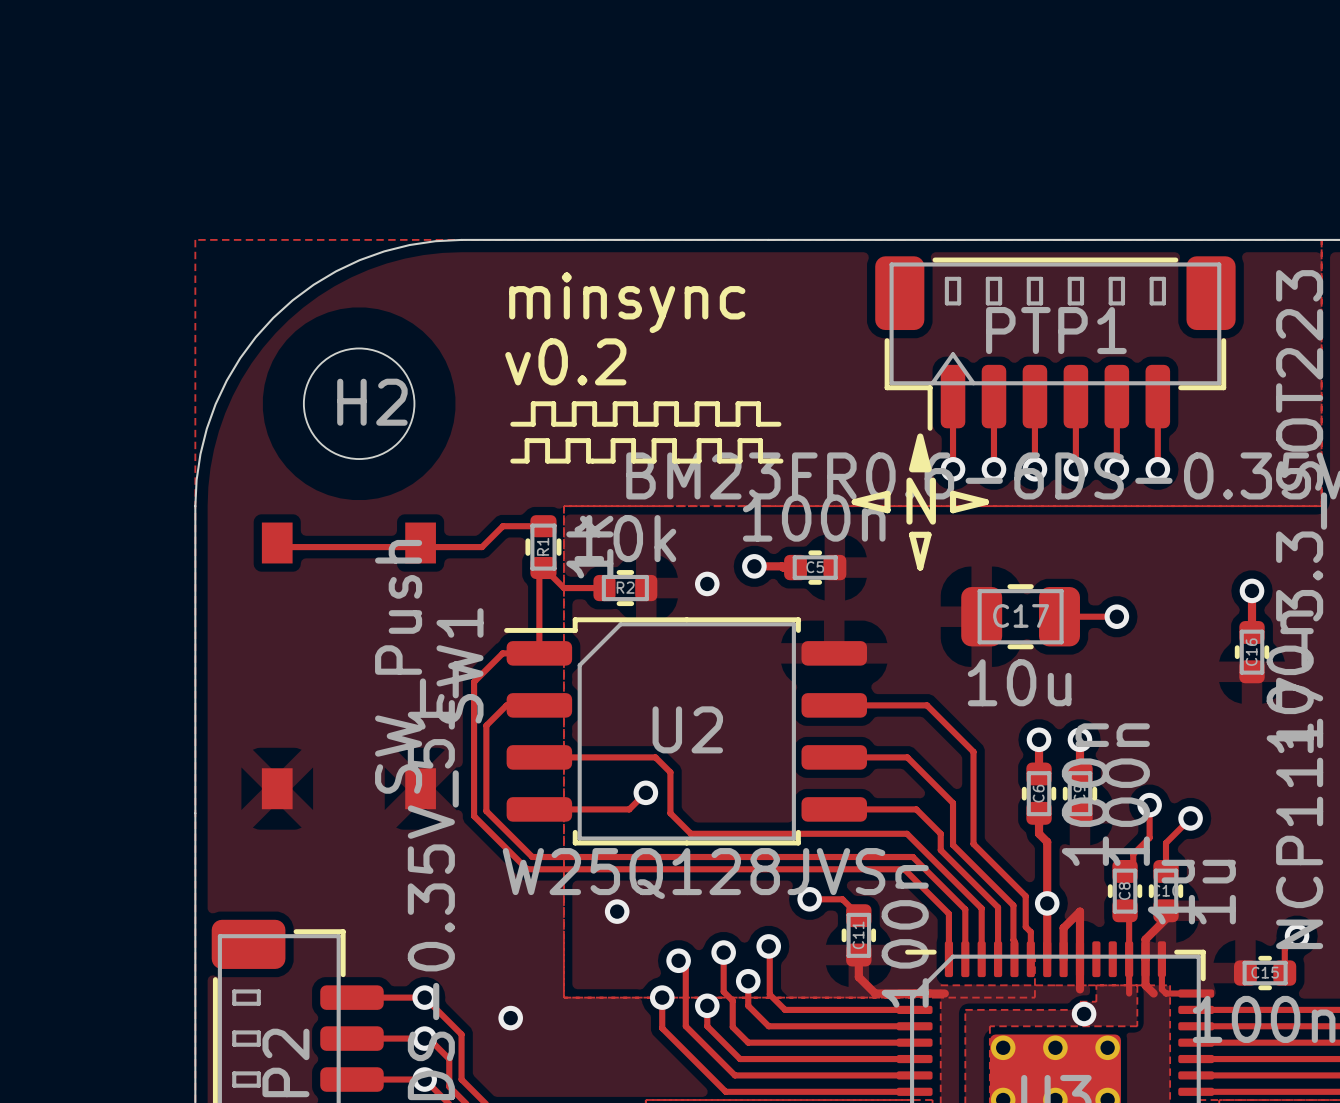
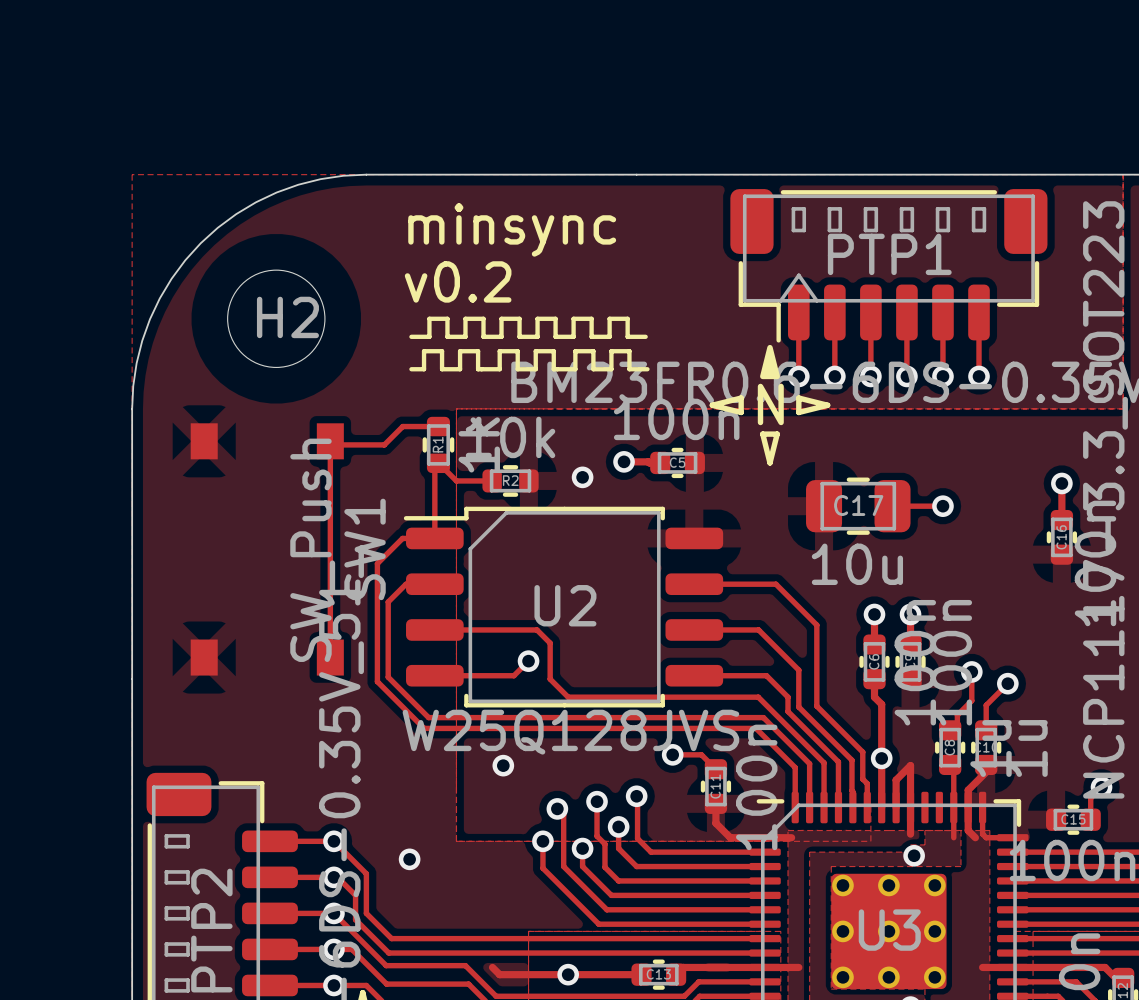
track: none -> (330, 441) (330, 657)
track: (277, 547) (420, 547) -> none

